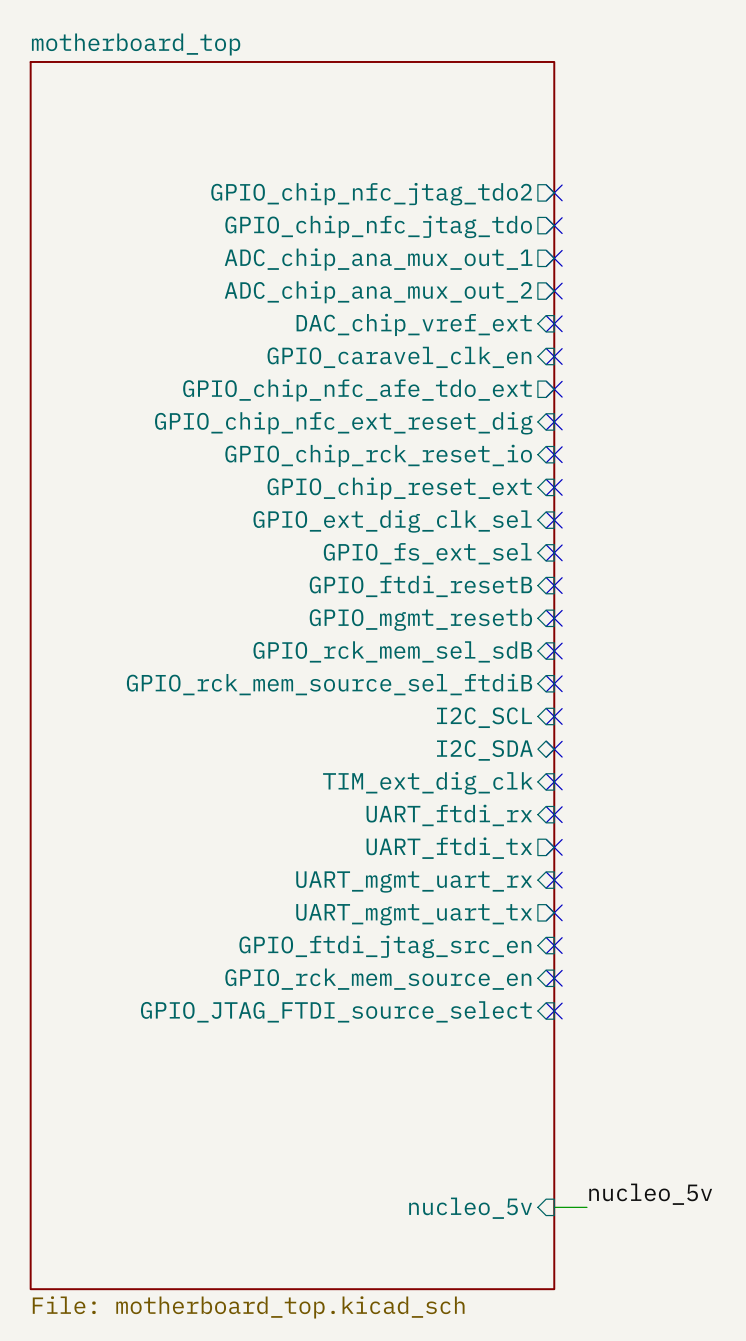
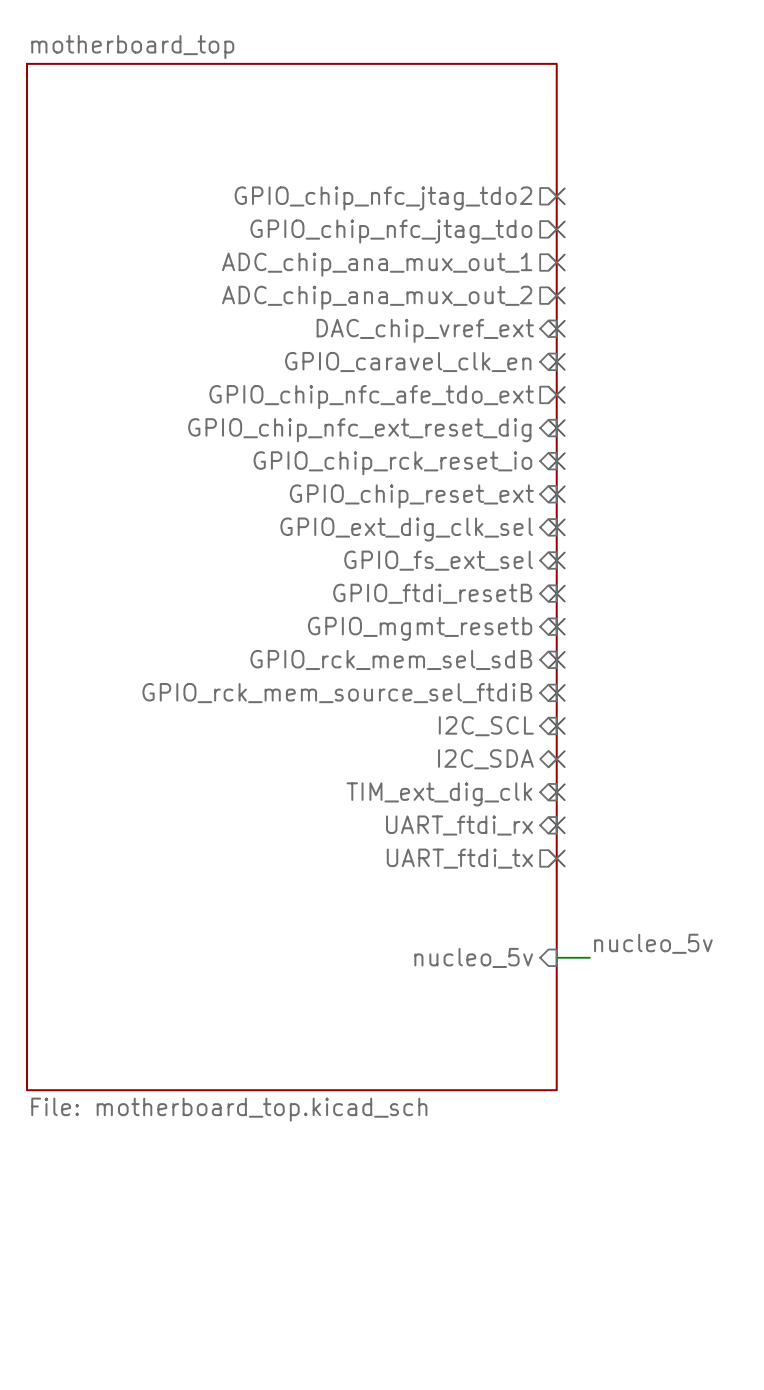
sheet motherboard_top: none -> File: motherboard_top.kicad_sch (291, 577)
sheet motherboard_top: File: motherboard_top.kicad_sch (292, 675) -> none
no-connect mark: (554, 880) -> none
sheet pin: UART_mgmt_uart_rx (414, 881) -> none
no-connect mark: (554, 912) -> none
sheet pin: UART_mgmt_uart_tx (414, 914) -> none
no-connect mark: (554, 945) -> none
sheet pin: GPIO_ftdi_jtag_src_en (385, 946) -> nucleo_5v (473, 957)
no-connect mark: (554, 978) -> none
sheet pin: GPIO_rck_mem_source_en (378, 979) -> none
sheet pin: GPIO_JTAG_FTDI_source_select (336, 1011) -> none
no-connect mark: (554, 1011) -> none
label position: nucleo_5v (650, 1194) -> nucleo_5v (653, 943)
wire: (554, 1207) (586, 1207) -> (556, 957) (589, 957)
sheet pin: nucleo_5v (470, 1208) -> none

